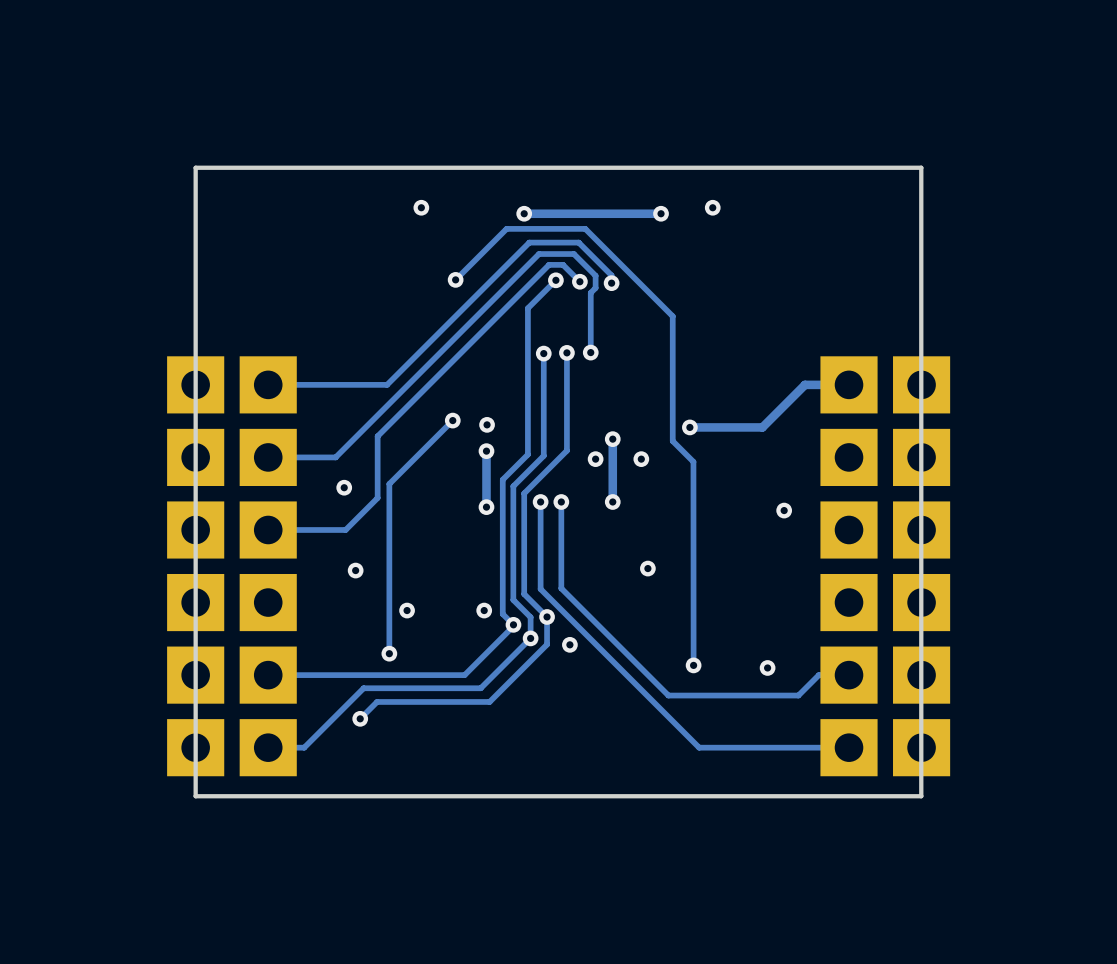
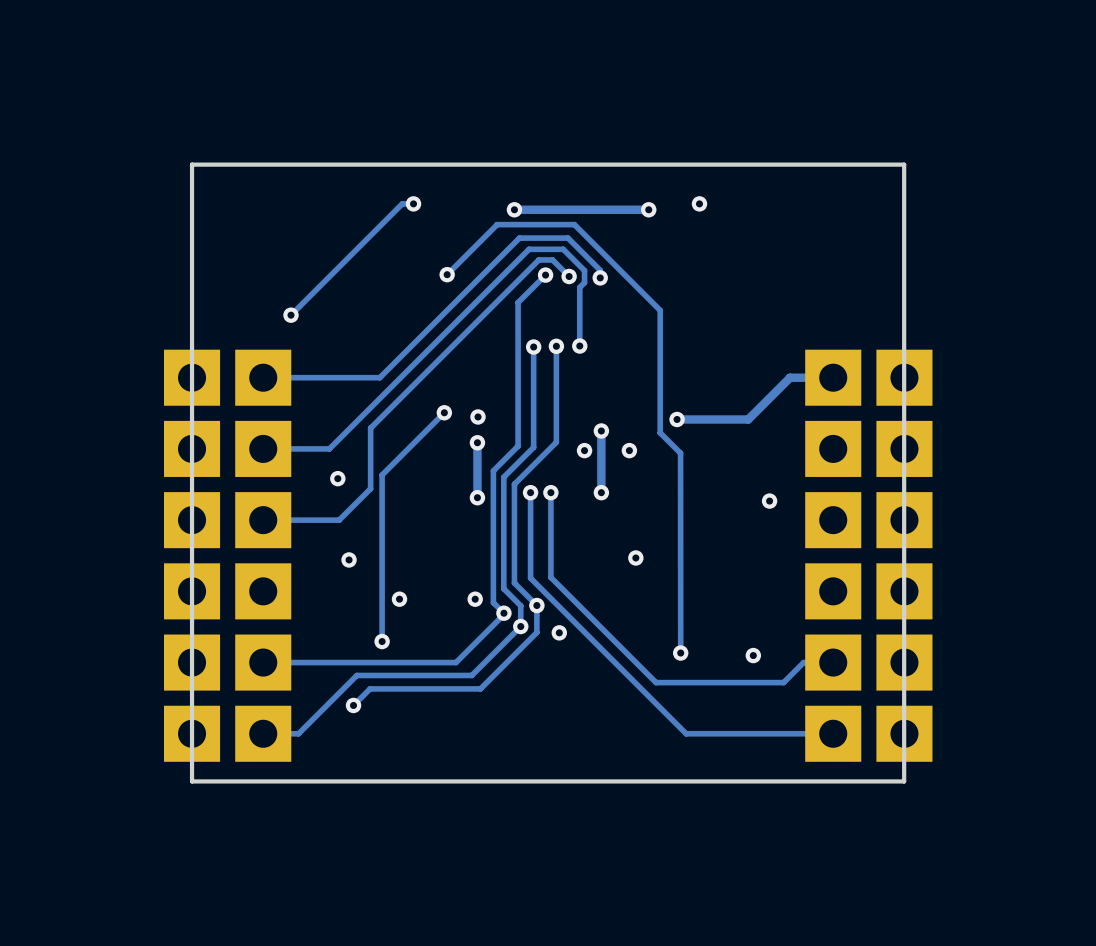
track: none -> (413, 203) (402, 203) (291, 315)
via: none -> (291, 315)

